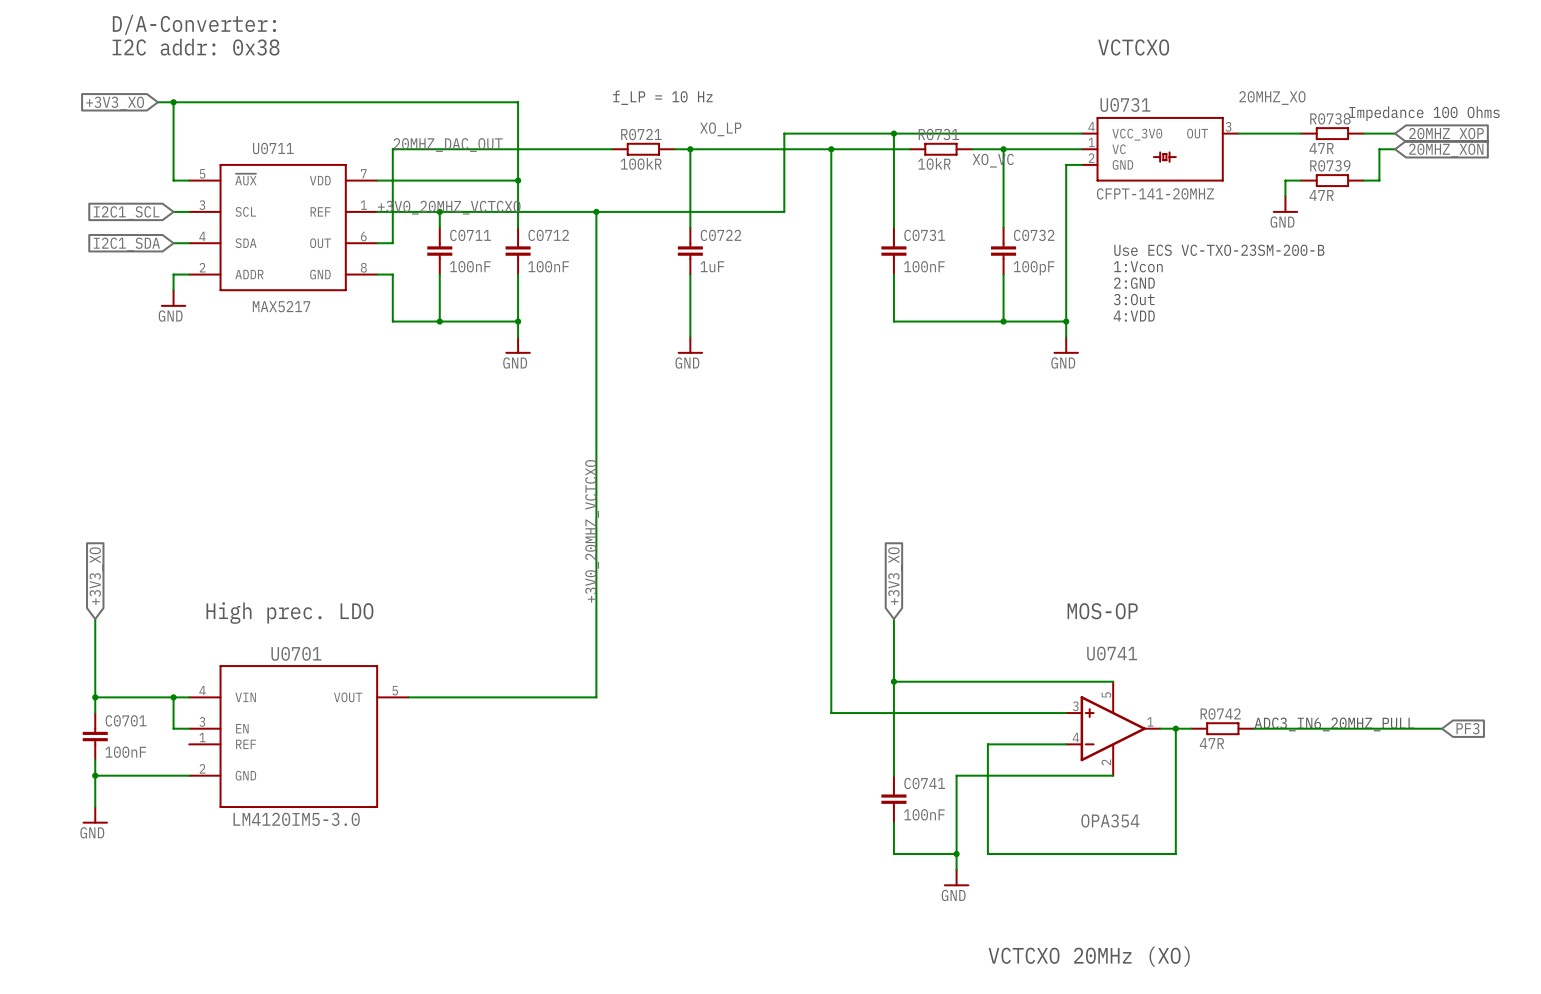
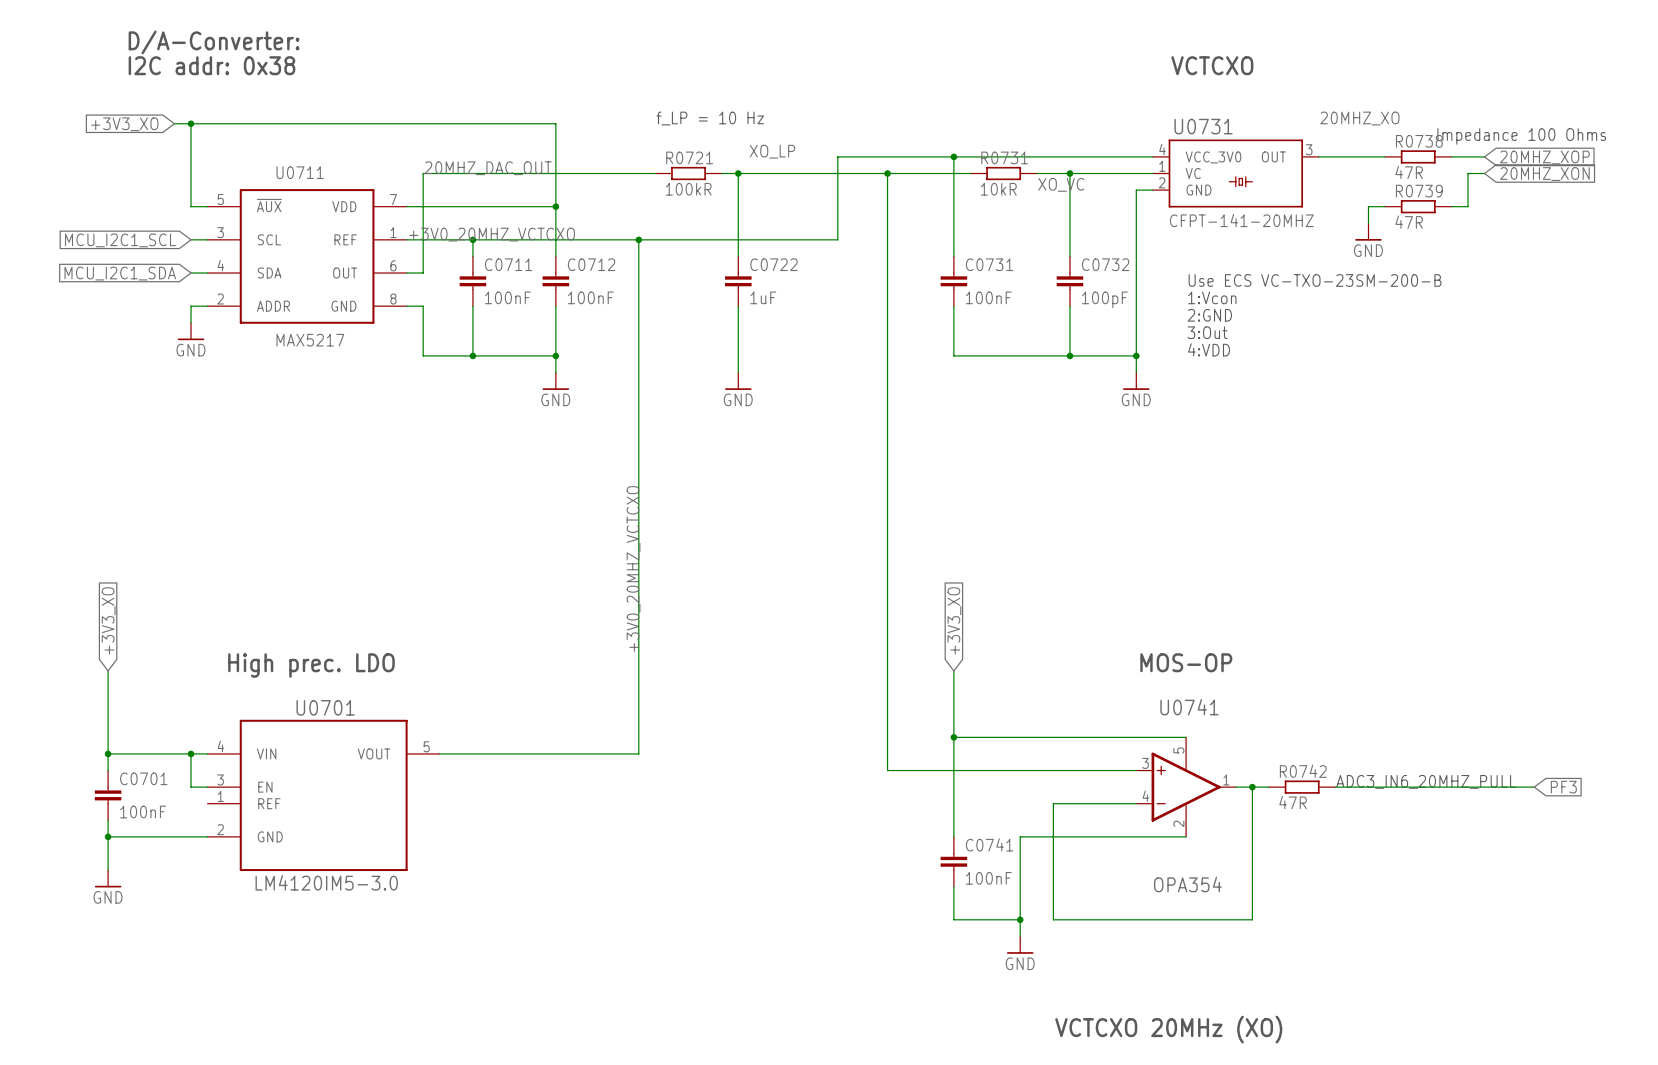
global label: I2C1_SCL (126, 213) -> MCU_I2C1_SCL (120, 240)
global label: I2C1_SDA (126, 244) -> MCU_I2C1_SDA (120, 273)

